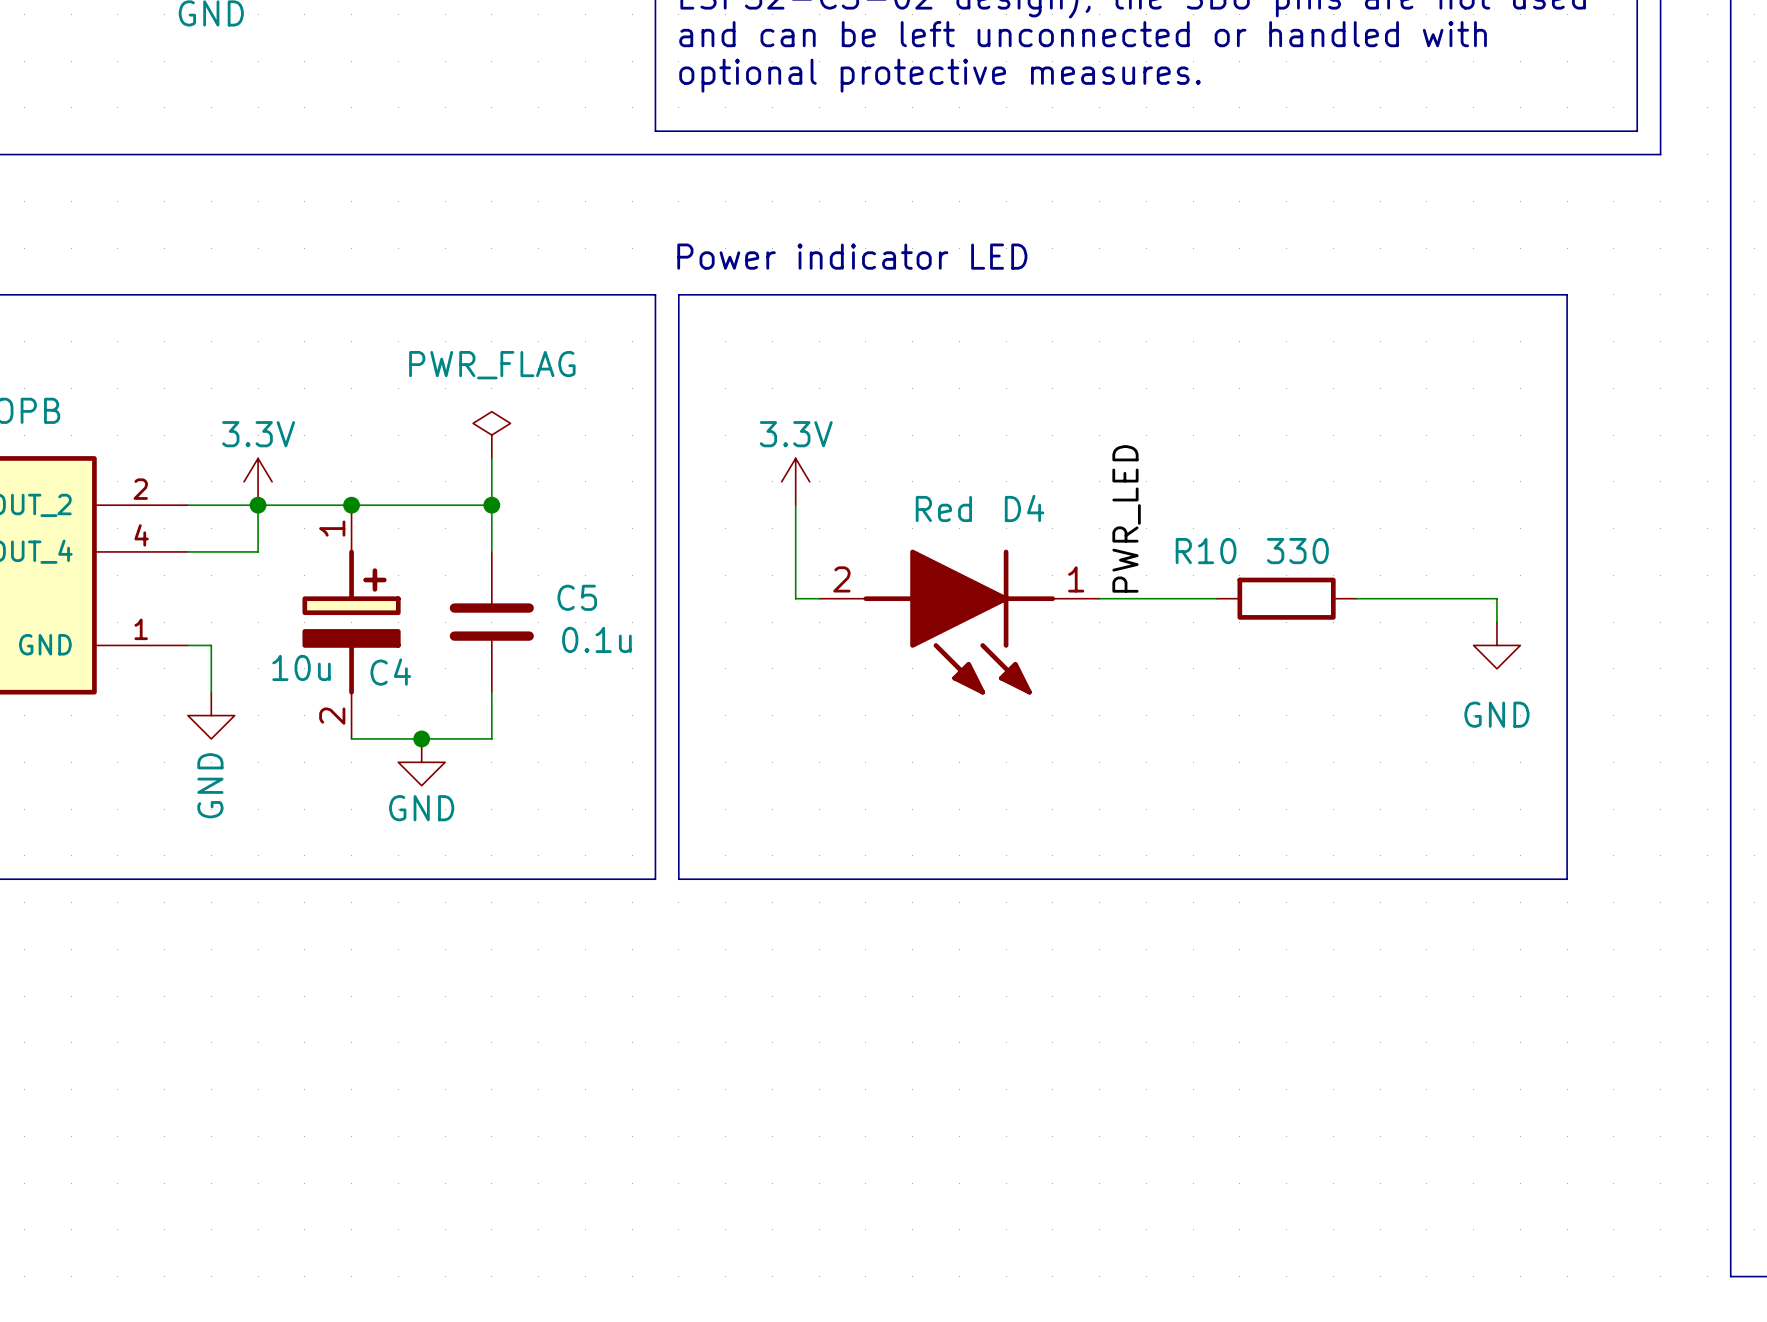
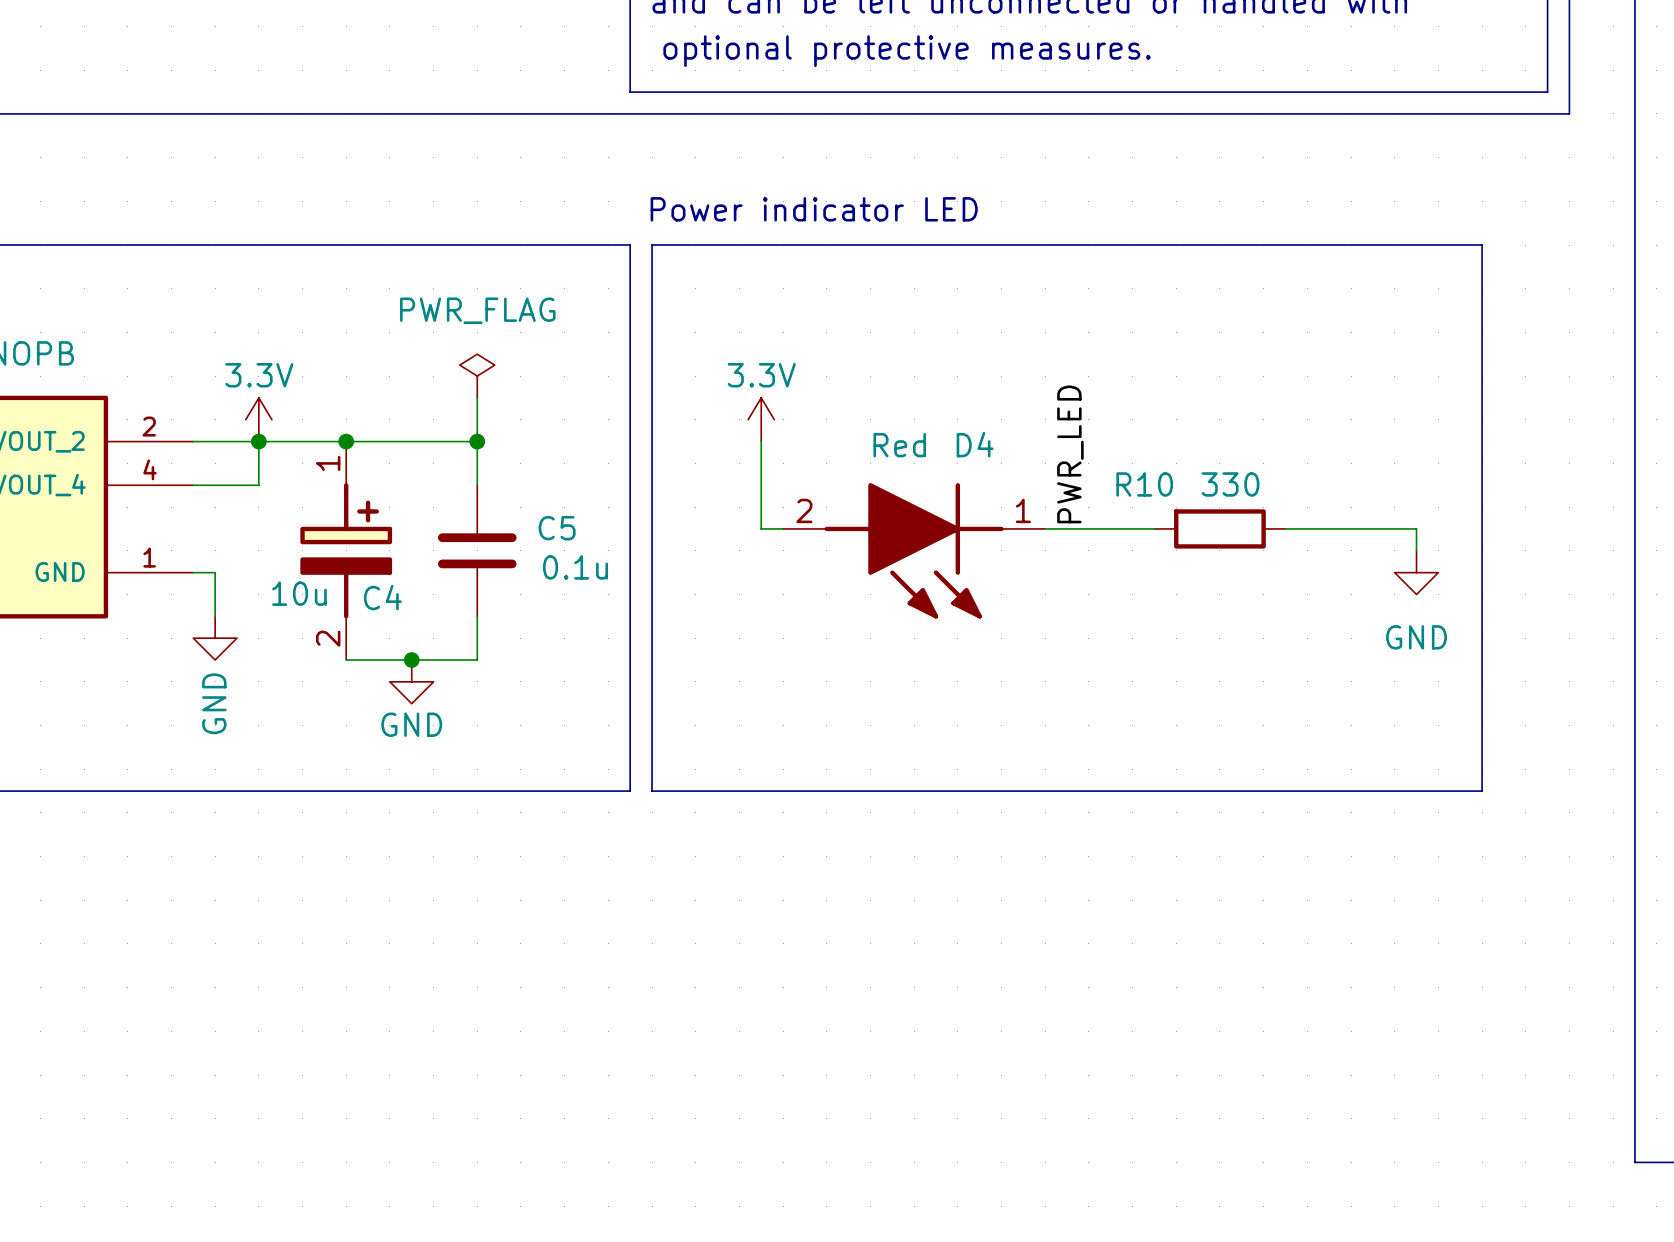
text position: optional protective measures. (940, 75) -> optional protective measures. (907, 51)

